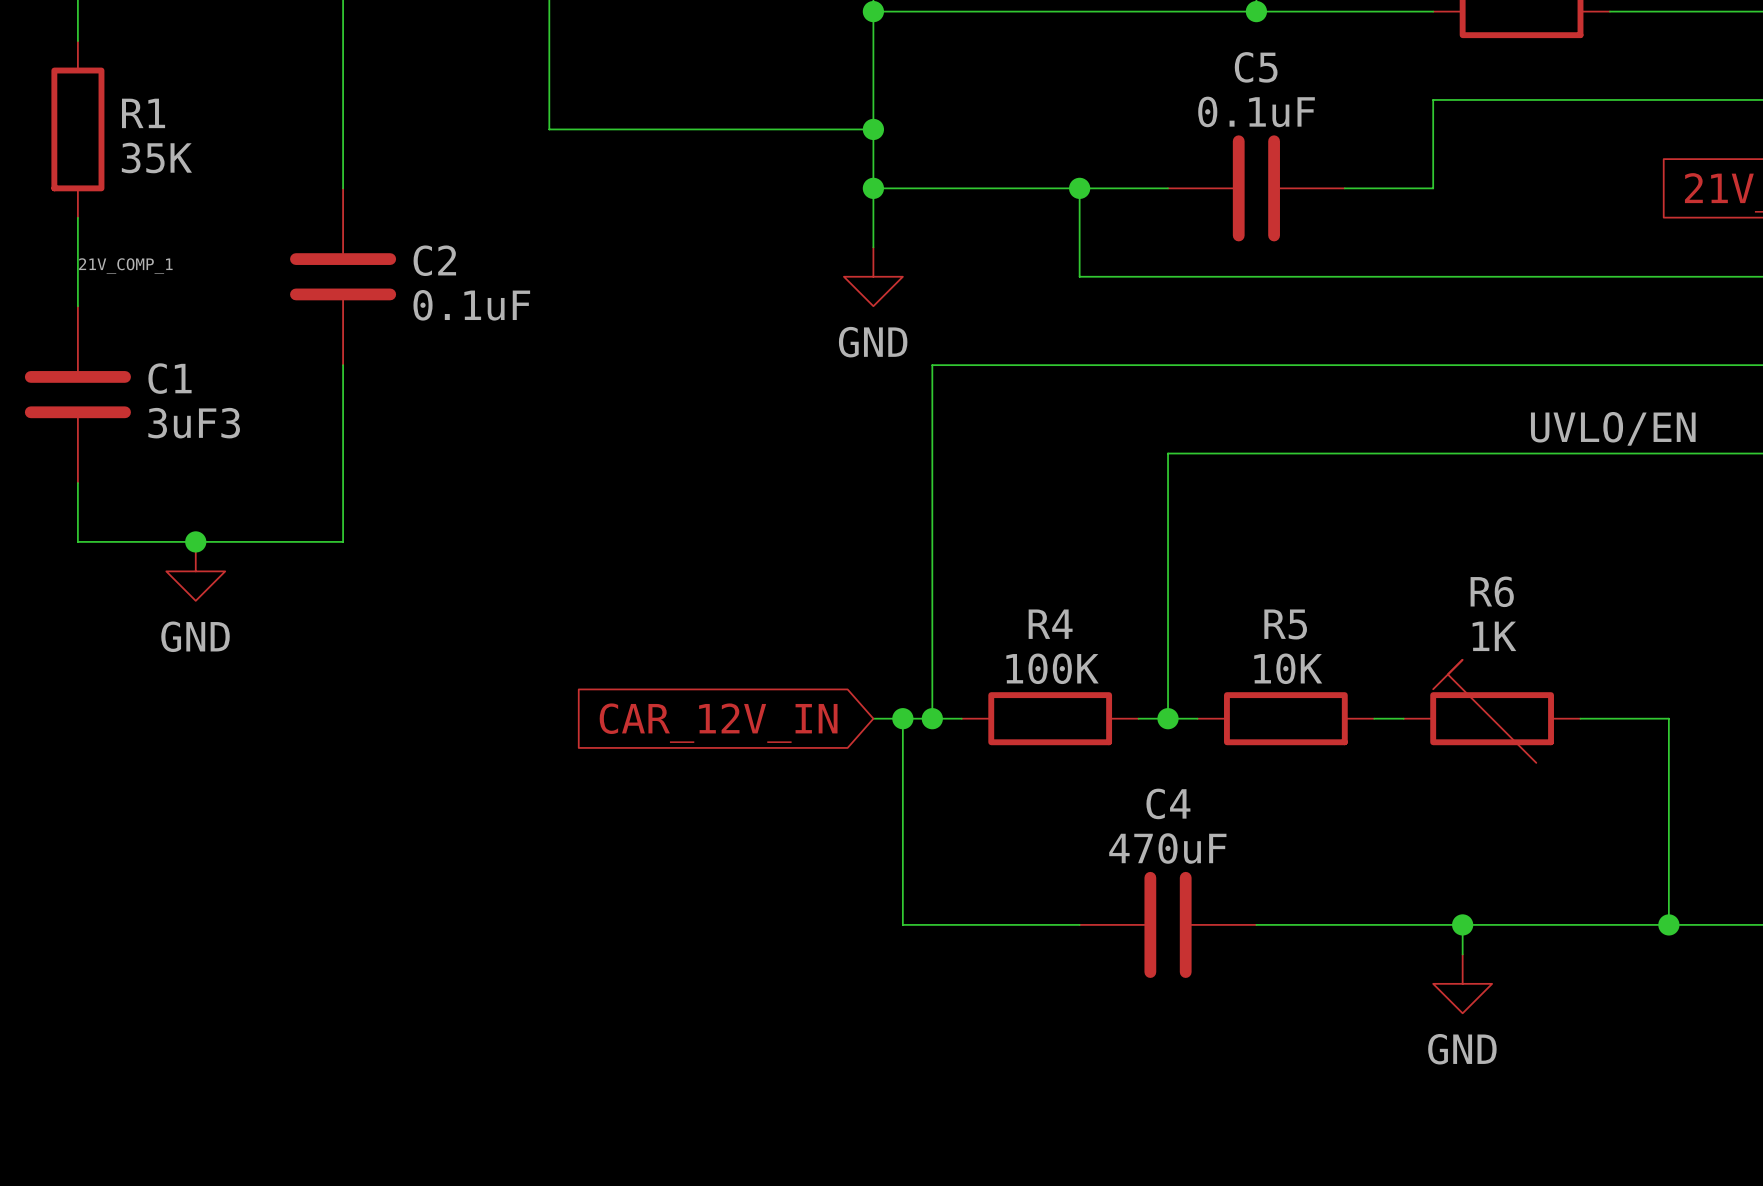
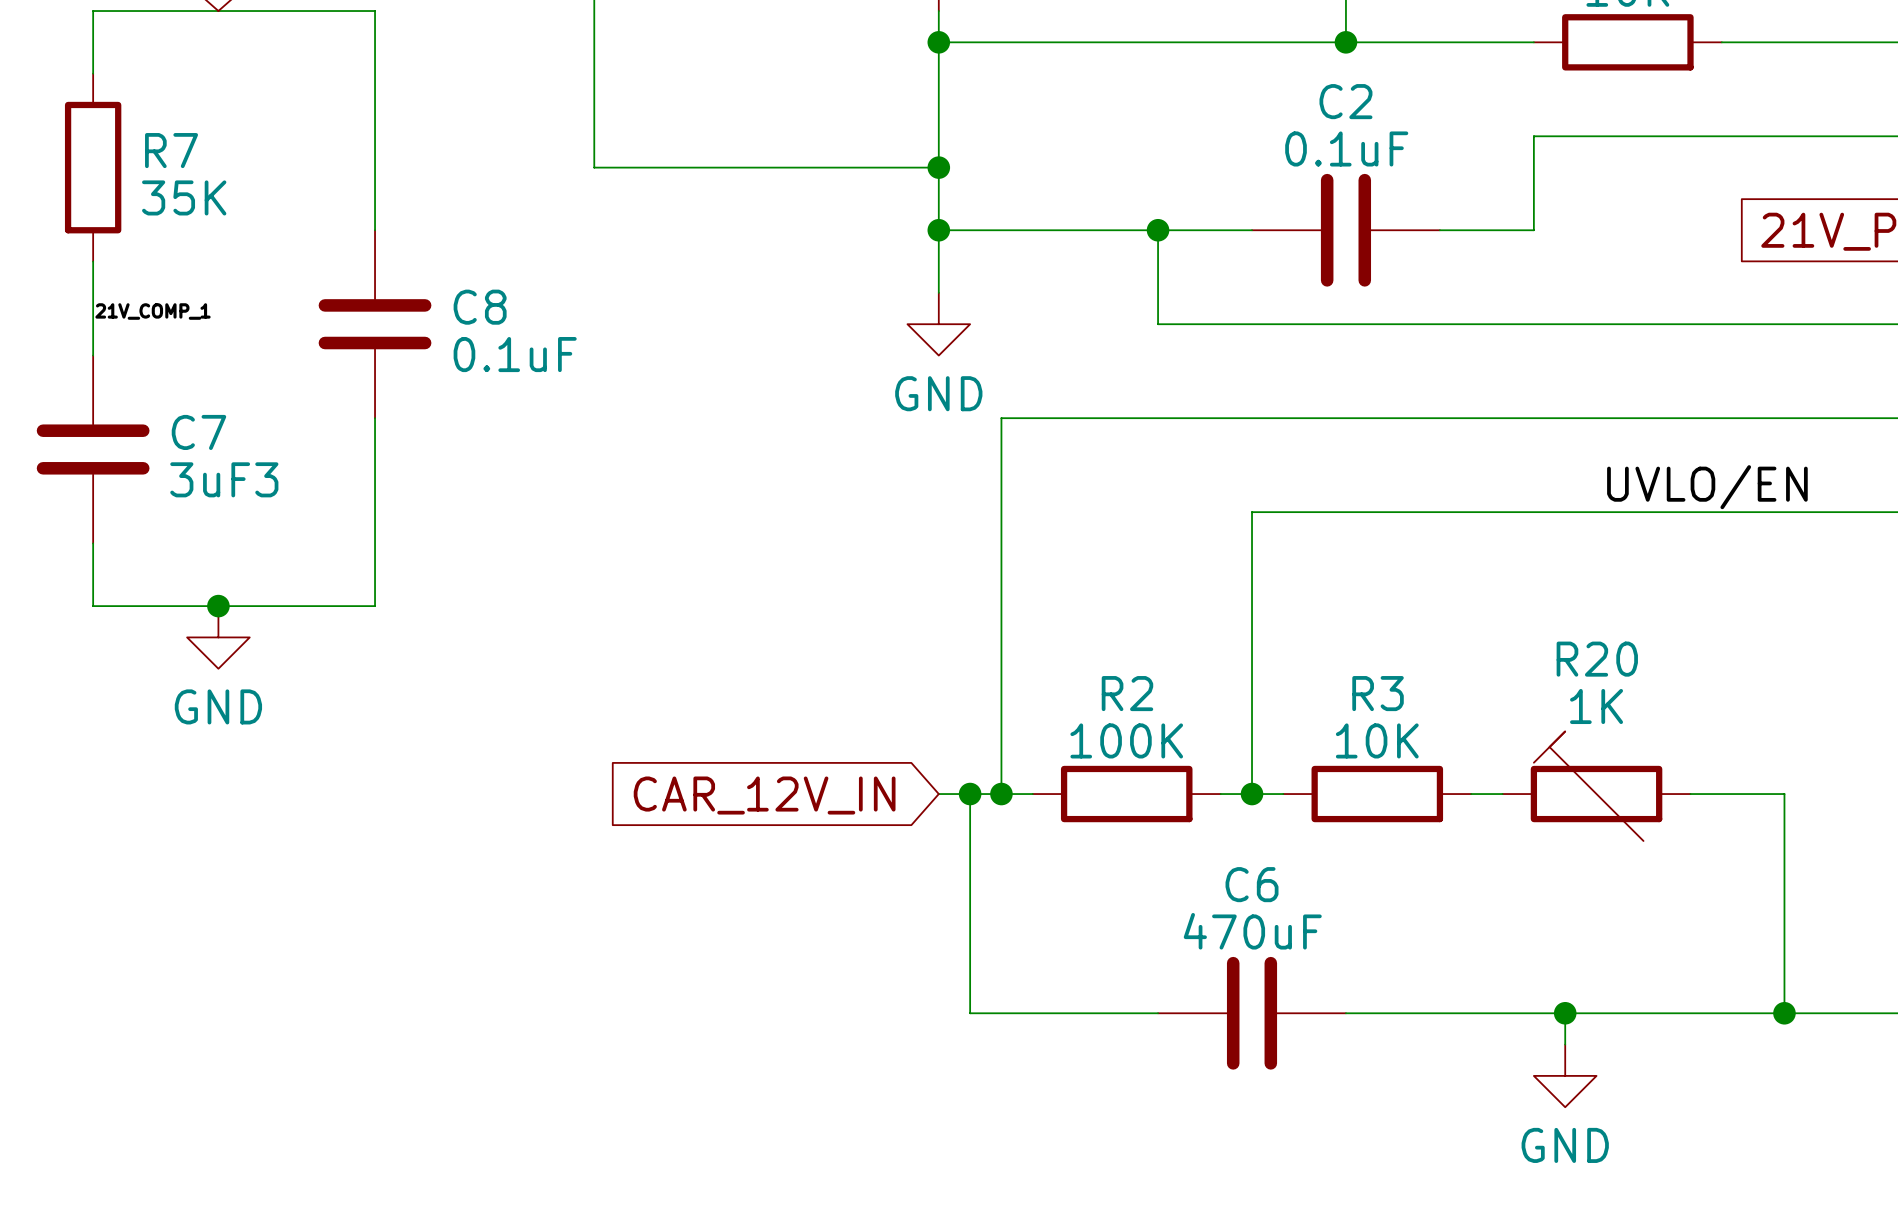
C5 name: C5 (1256, 67) -> C2 (1345, 101)
R1 name: R1 (143, 113) -> R7 (171, 150)
C2 name: C2 (434, 260) -> C8 (480, 307)
C1 name: C1 (170, 378) -> C7 (198, 432)
R6 name: R6 (1492, 591) -> R20 (1597, 659)
R4 name: R4 (1050, 624) -> R2 (1127, 693)
R5 name: R5 (1285, 624) -> R3 (1378, 693)
C4 name: C4 (1168, 803) -> C6 (1252, 884)

